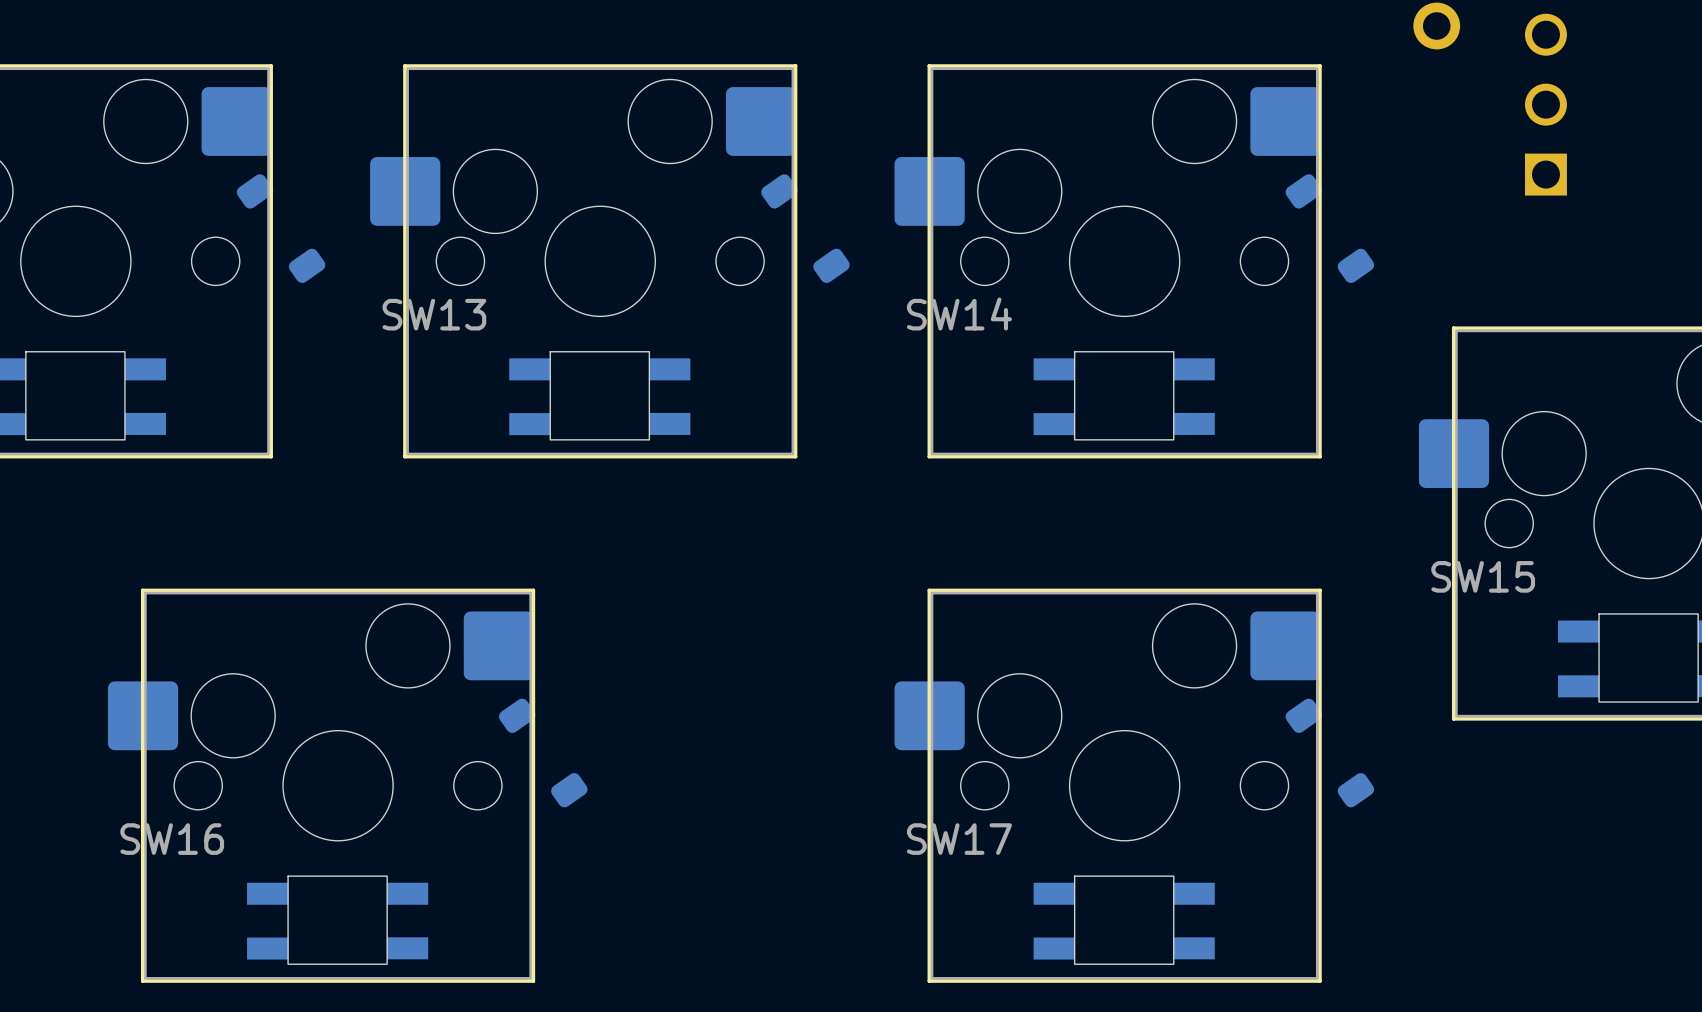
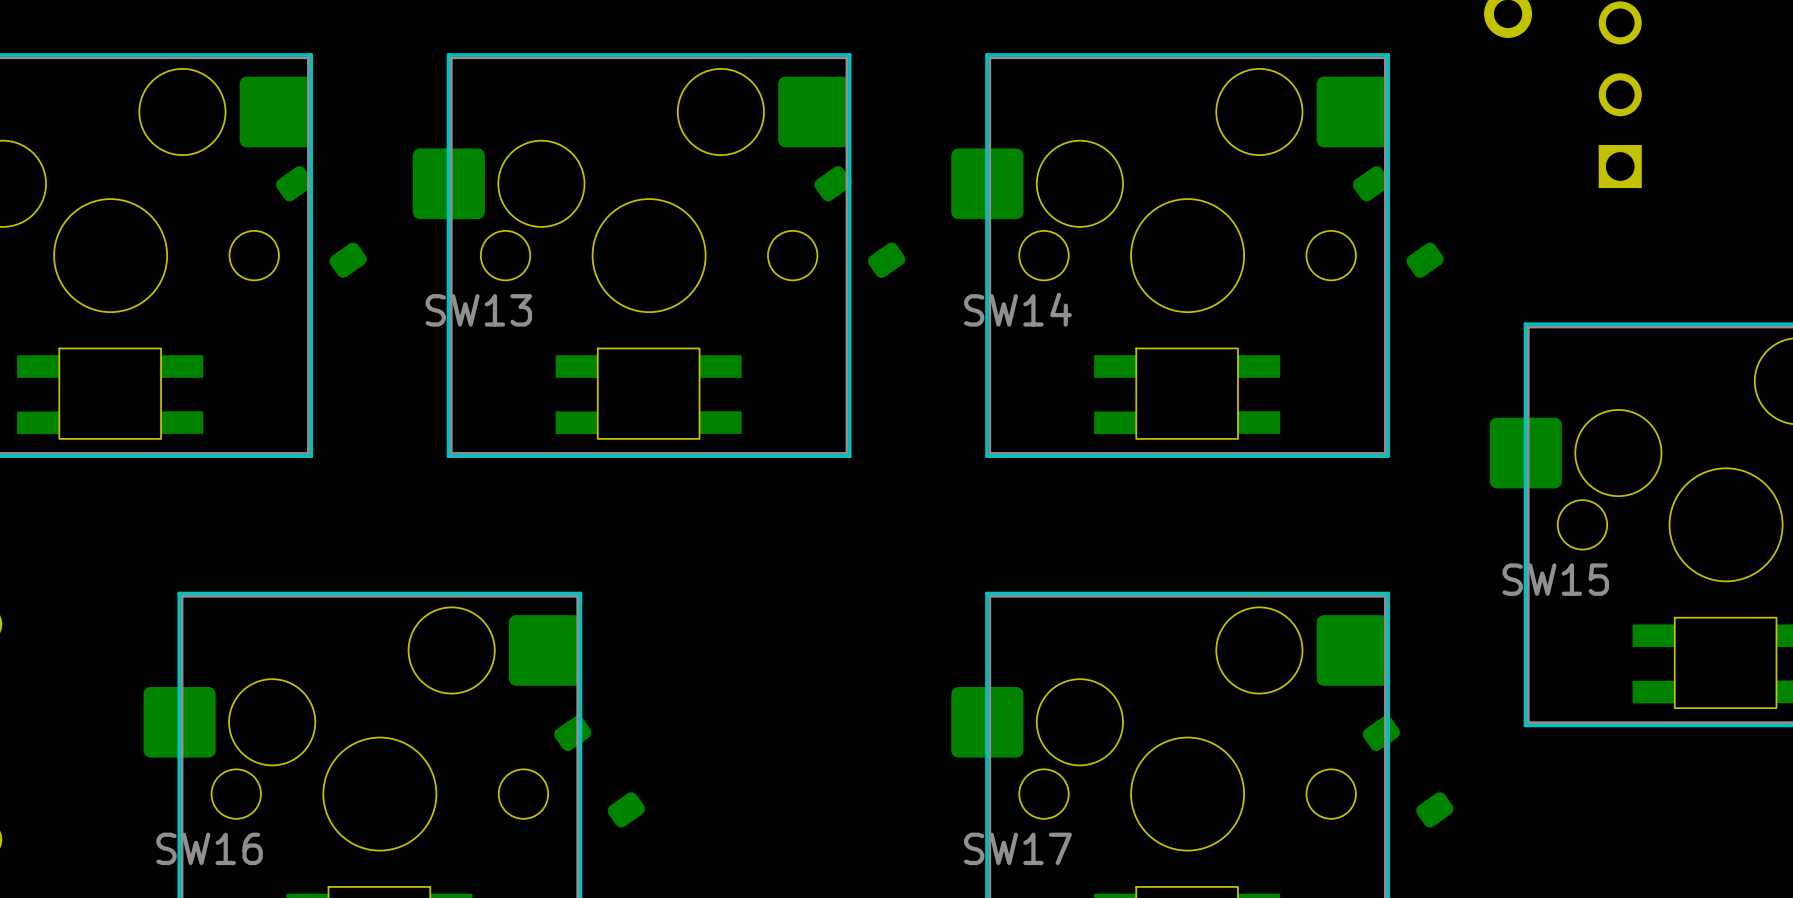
part position: (543, 753) -> (599, 771)
part position: (1329, 753) -> (1408, 771)

